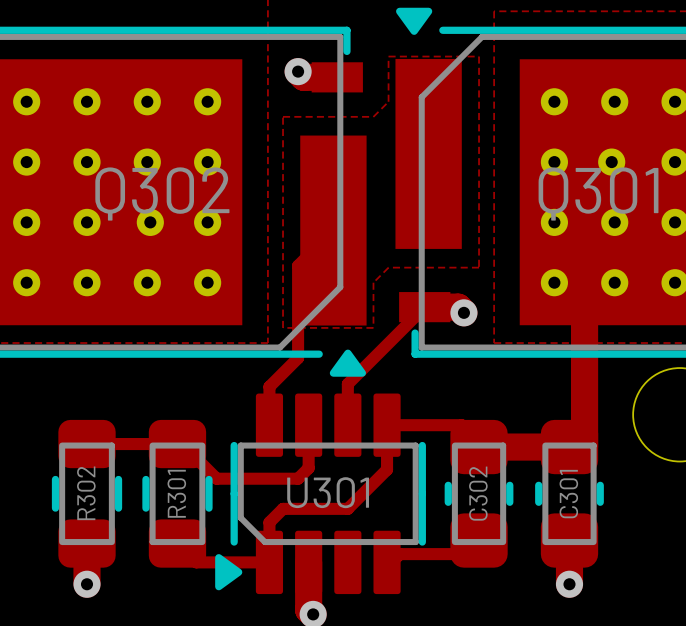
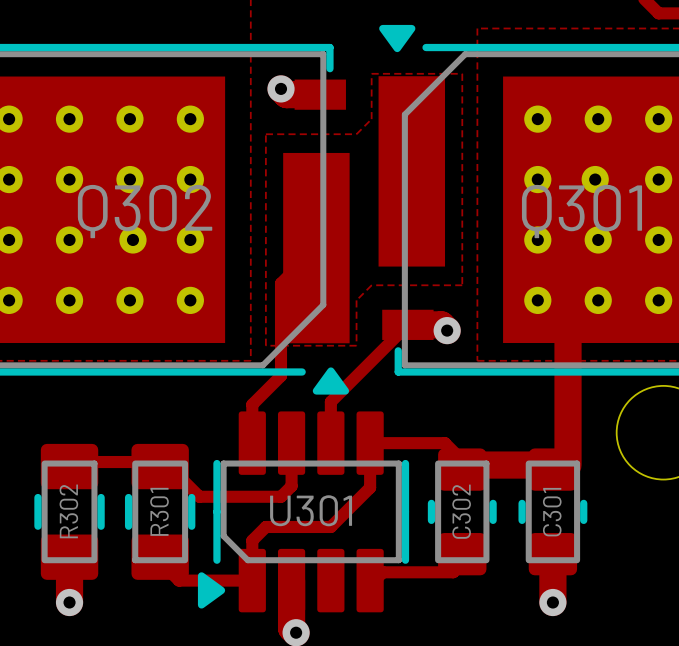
R302 footprint: [51, 419, 123, 568] -> [34, 443, 105, 580]
R301 footprint: [142, 419, 213, 568] -> [124, 443, 196, 580]
C302 footprint: [444, 419, 514, 568] -> [427, 448, 497, 576]
C301 footprint: [535, 419, 604, 568] -> [518, 448, 588, 576]

